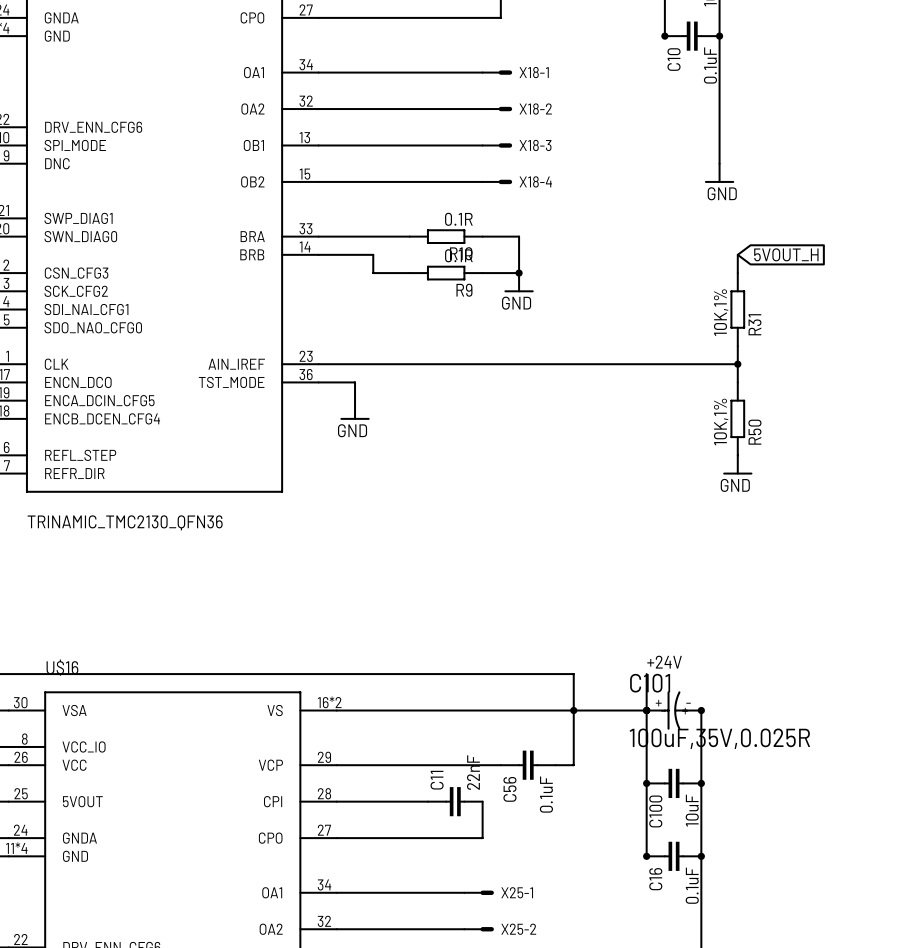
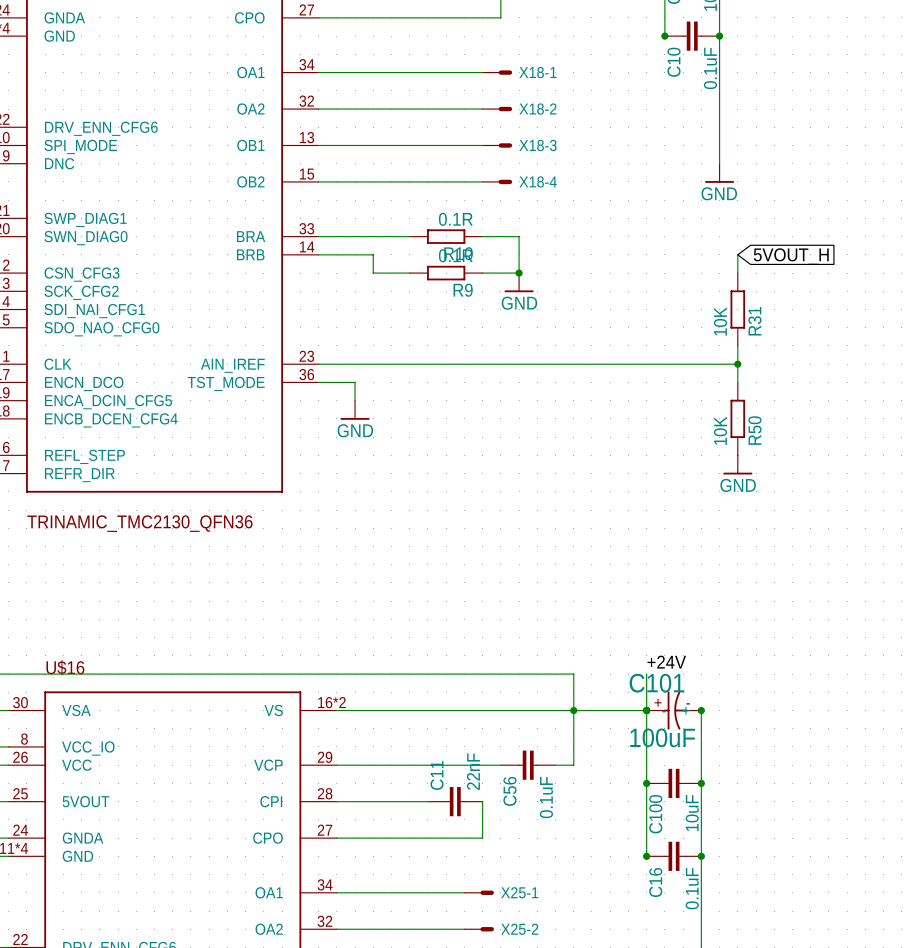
R31 value: 10K,1% (721, 312) -> 10K (720, 321)
R50 value: 10K,1% (721, 422) -> 10K (720, 430)
C101 value: 100uF,35V,0.025R (719, 738) -> 100uF (662, 737)

